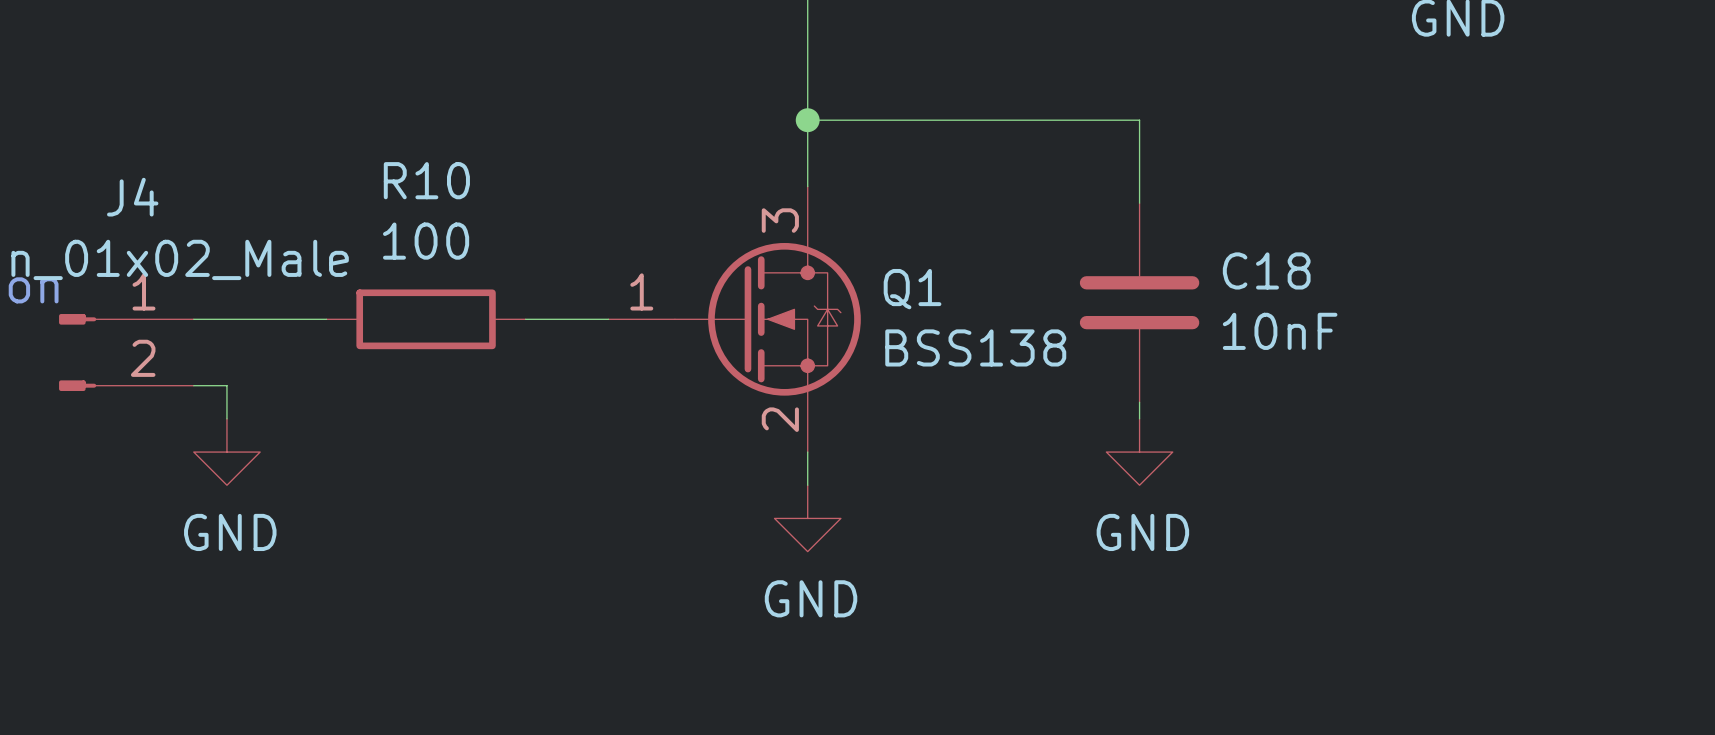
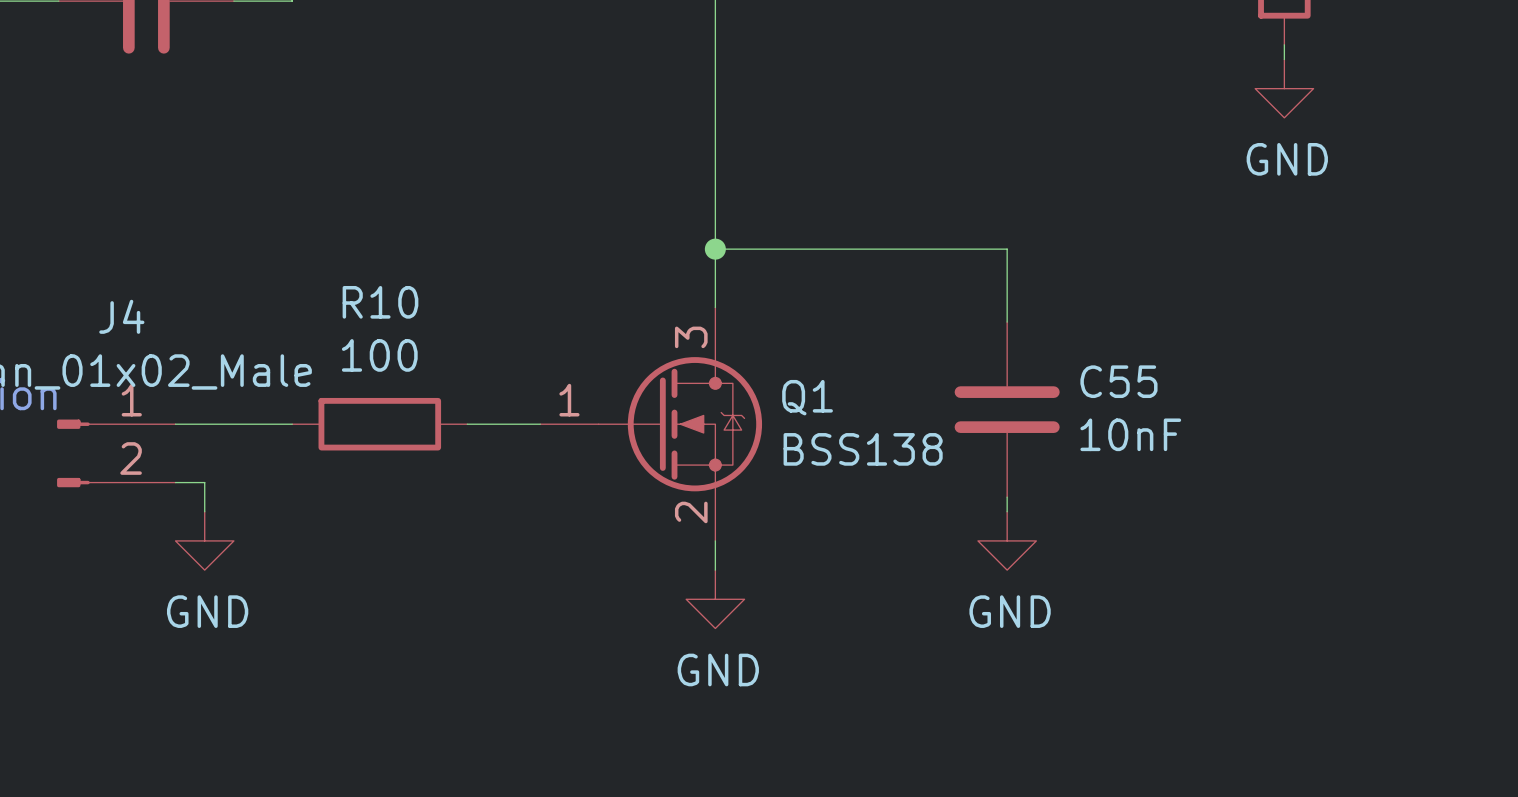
C18 name: C18 (1266, 270) -> C55 (1118, 381)

